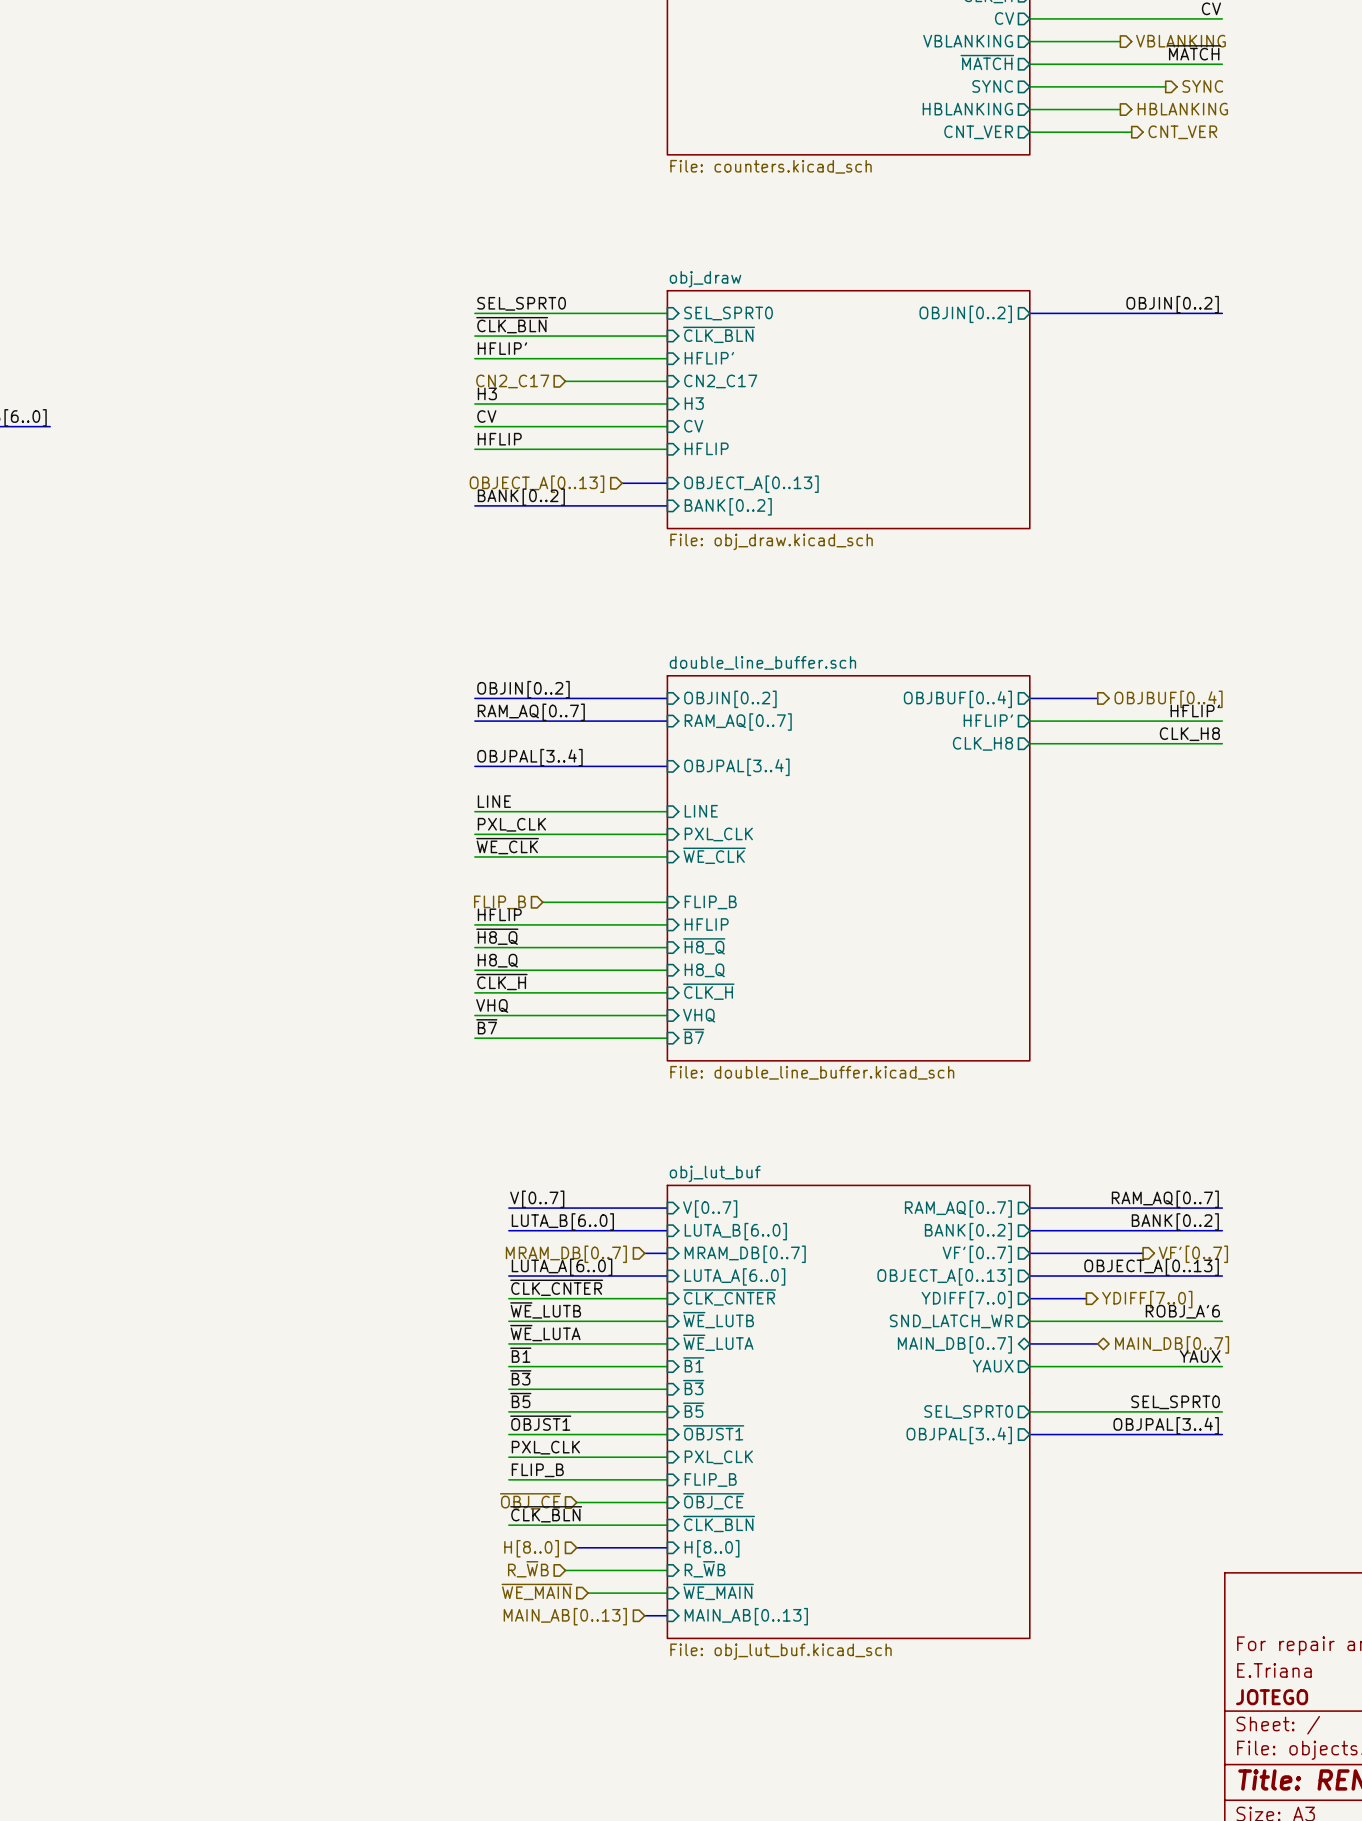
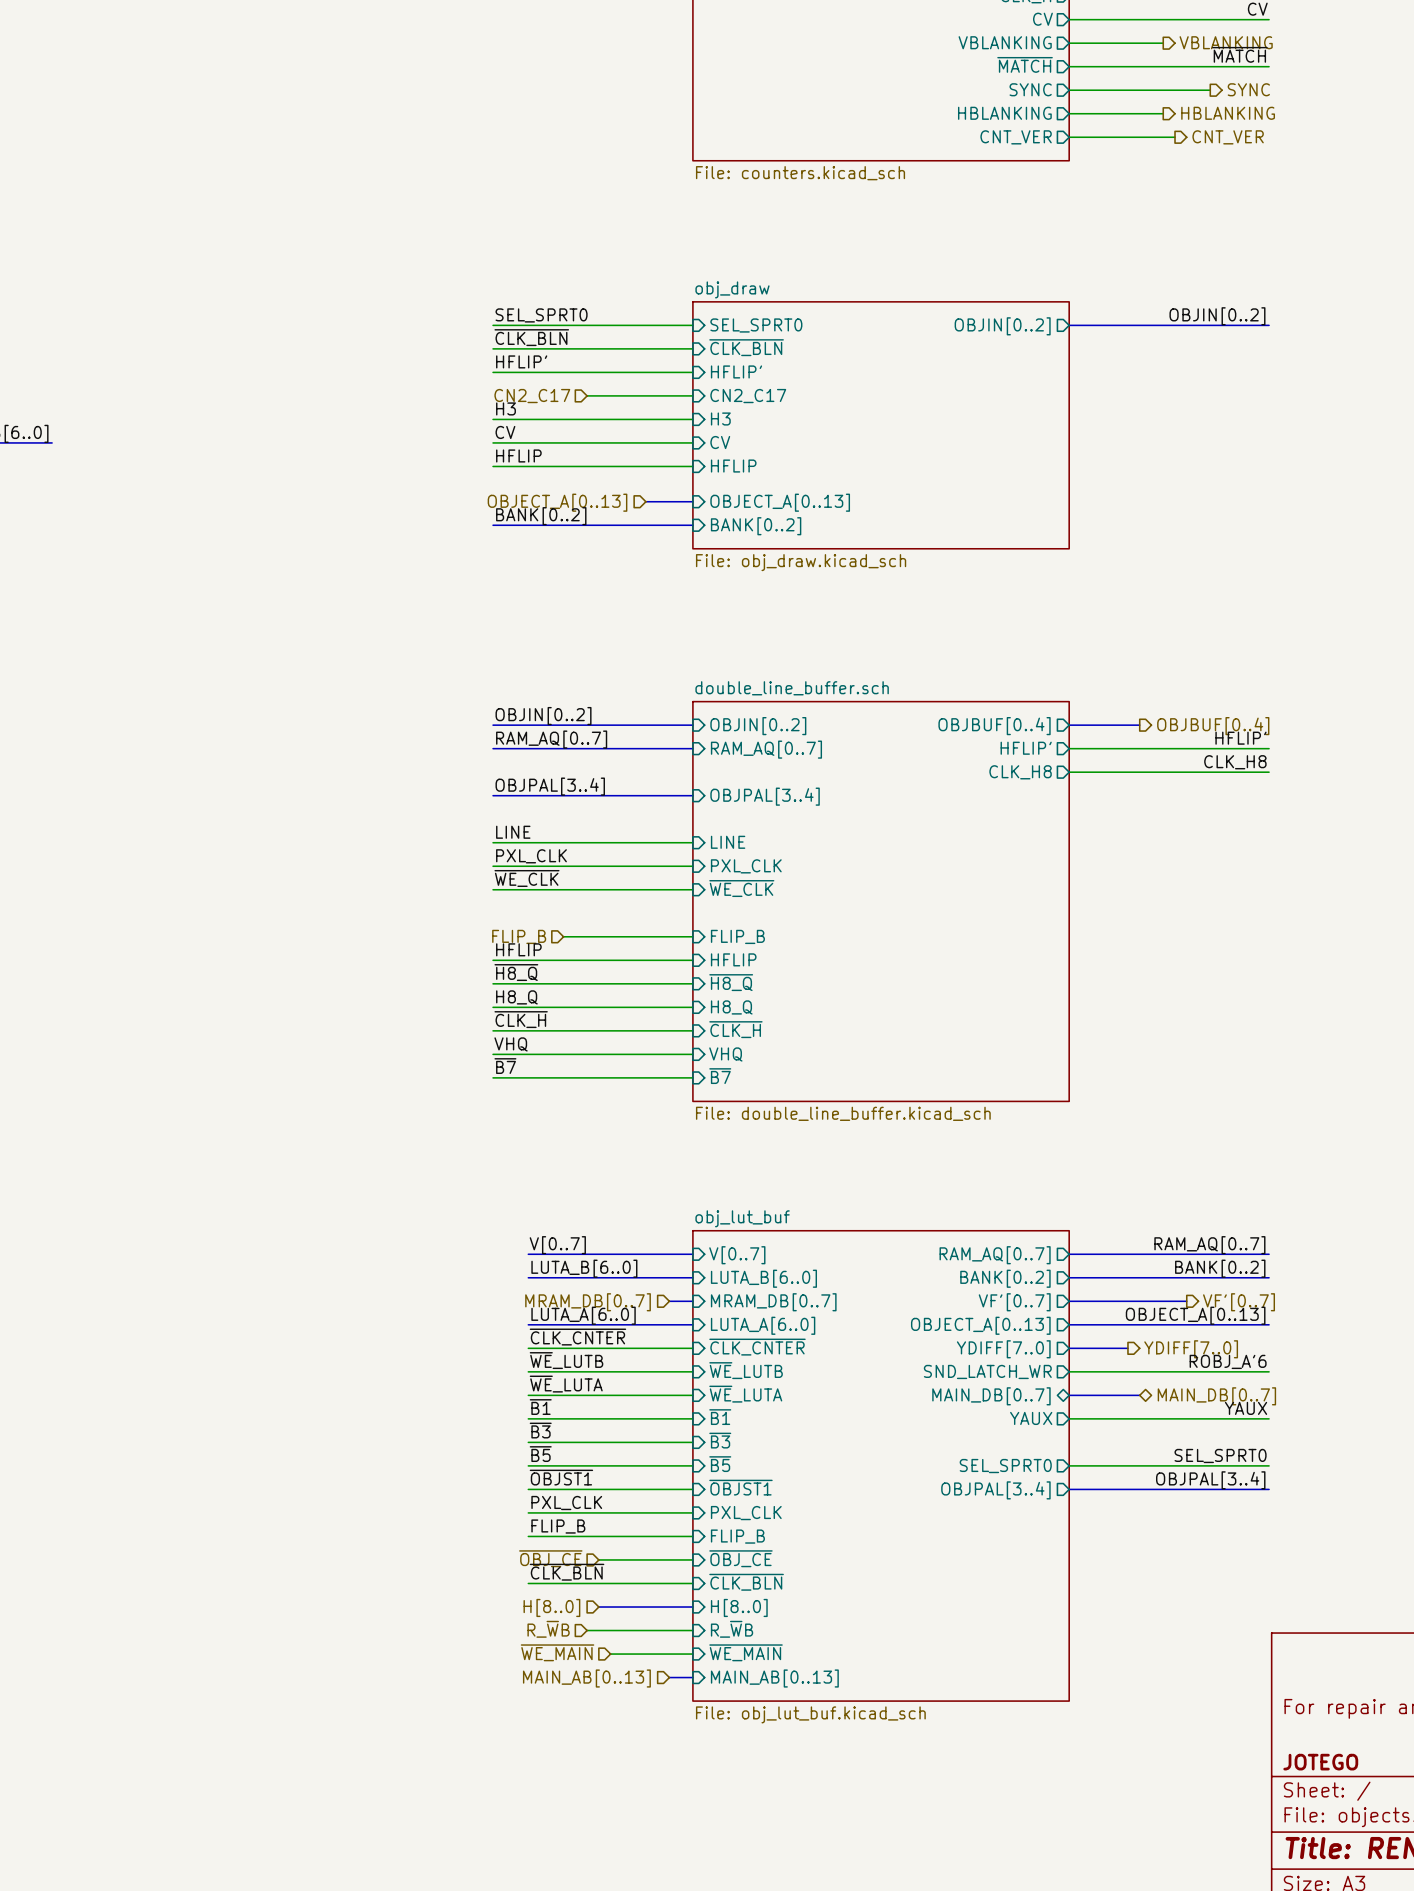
title block: E.Triana (1274, 1670) -> none

